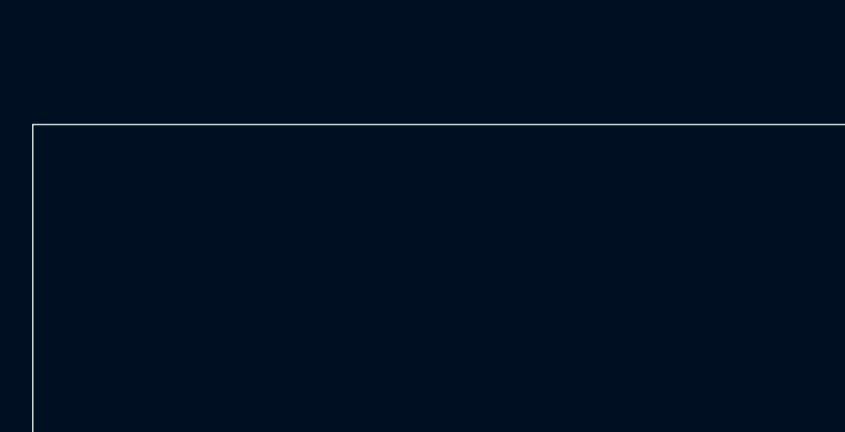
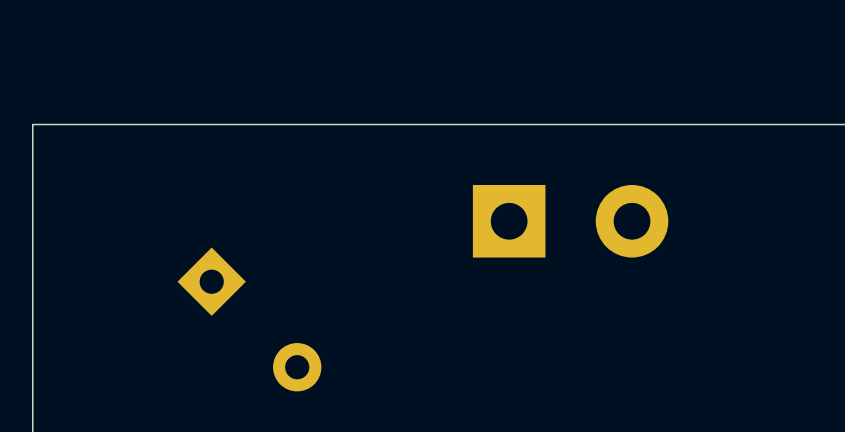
part: none -> (570, 221)
part: none -> (249, 319)

